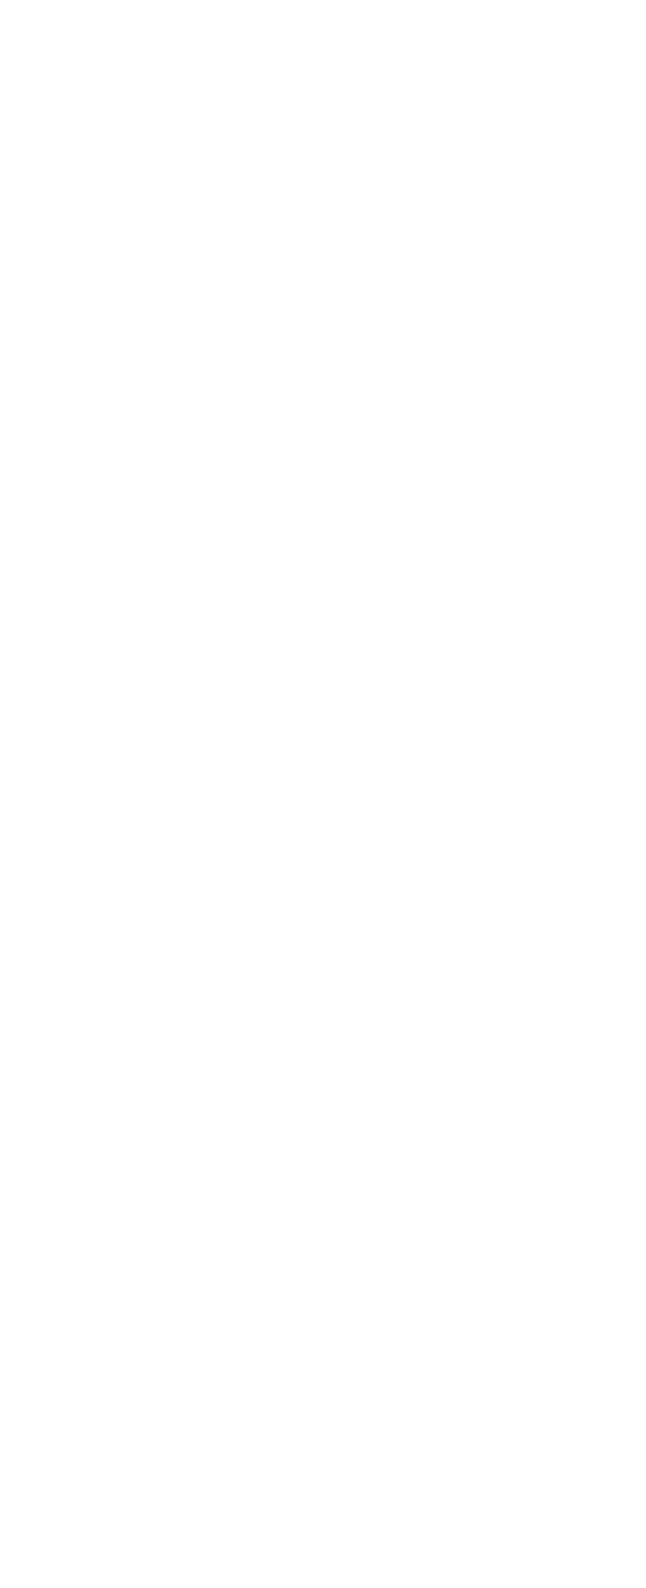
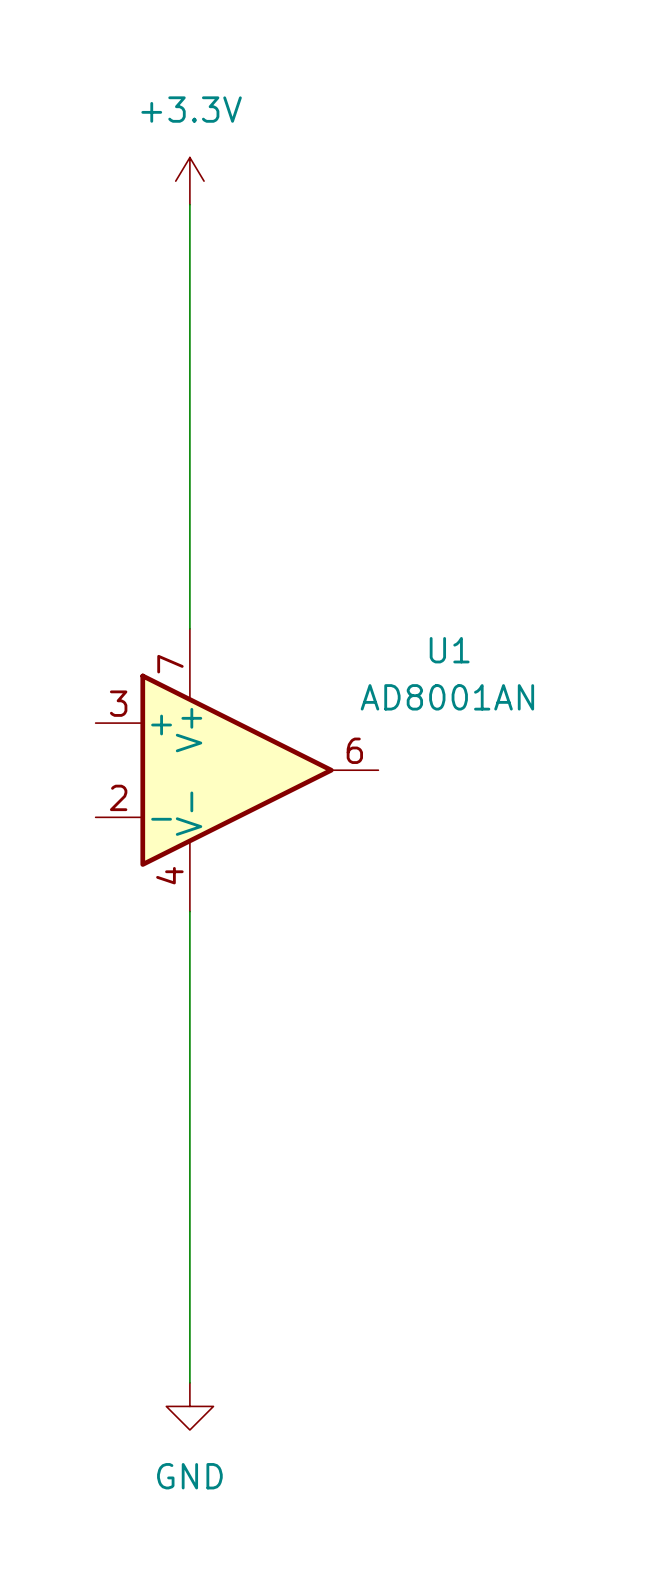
power symbol: none -> +3.3V (189, 181)
wire: none -> (189, 204) (189, 628)
U1: none -> AD8001AN (237, 770)
wire: none -> (189, 911) (189, 1382)
power symbol: none -> GND (189, 1406)

